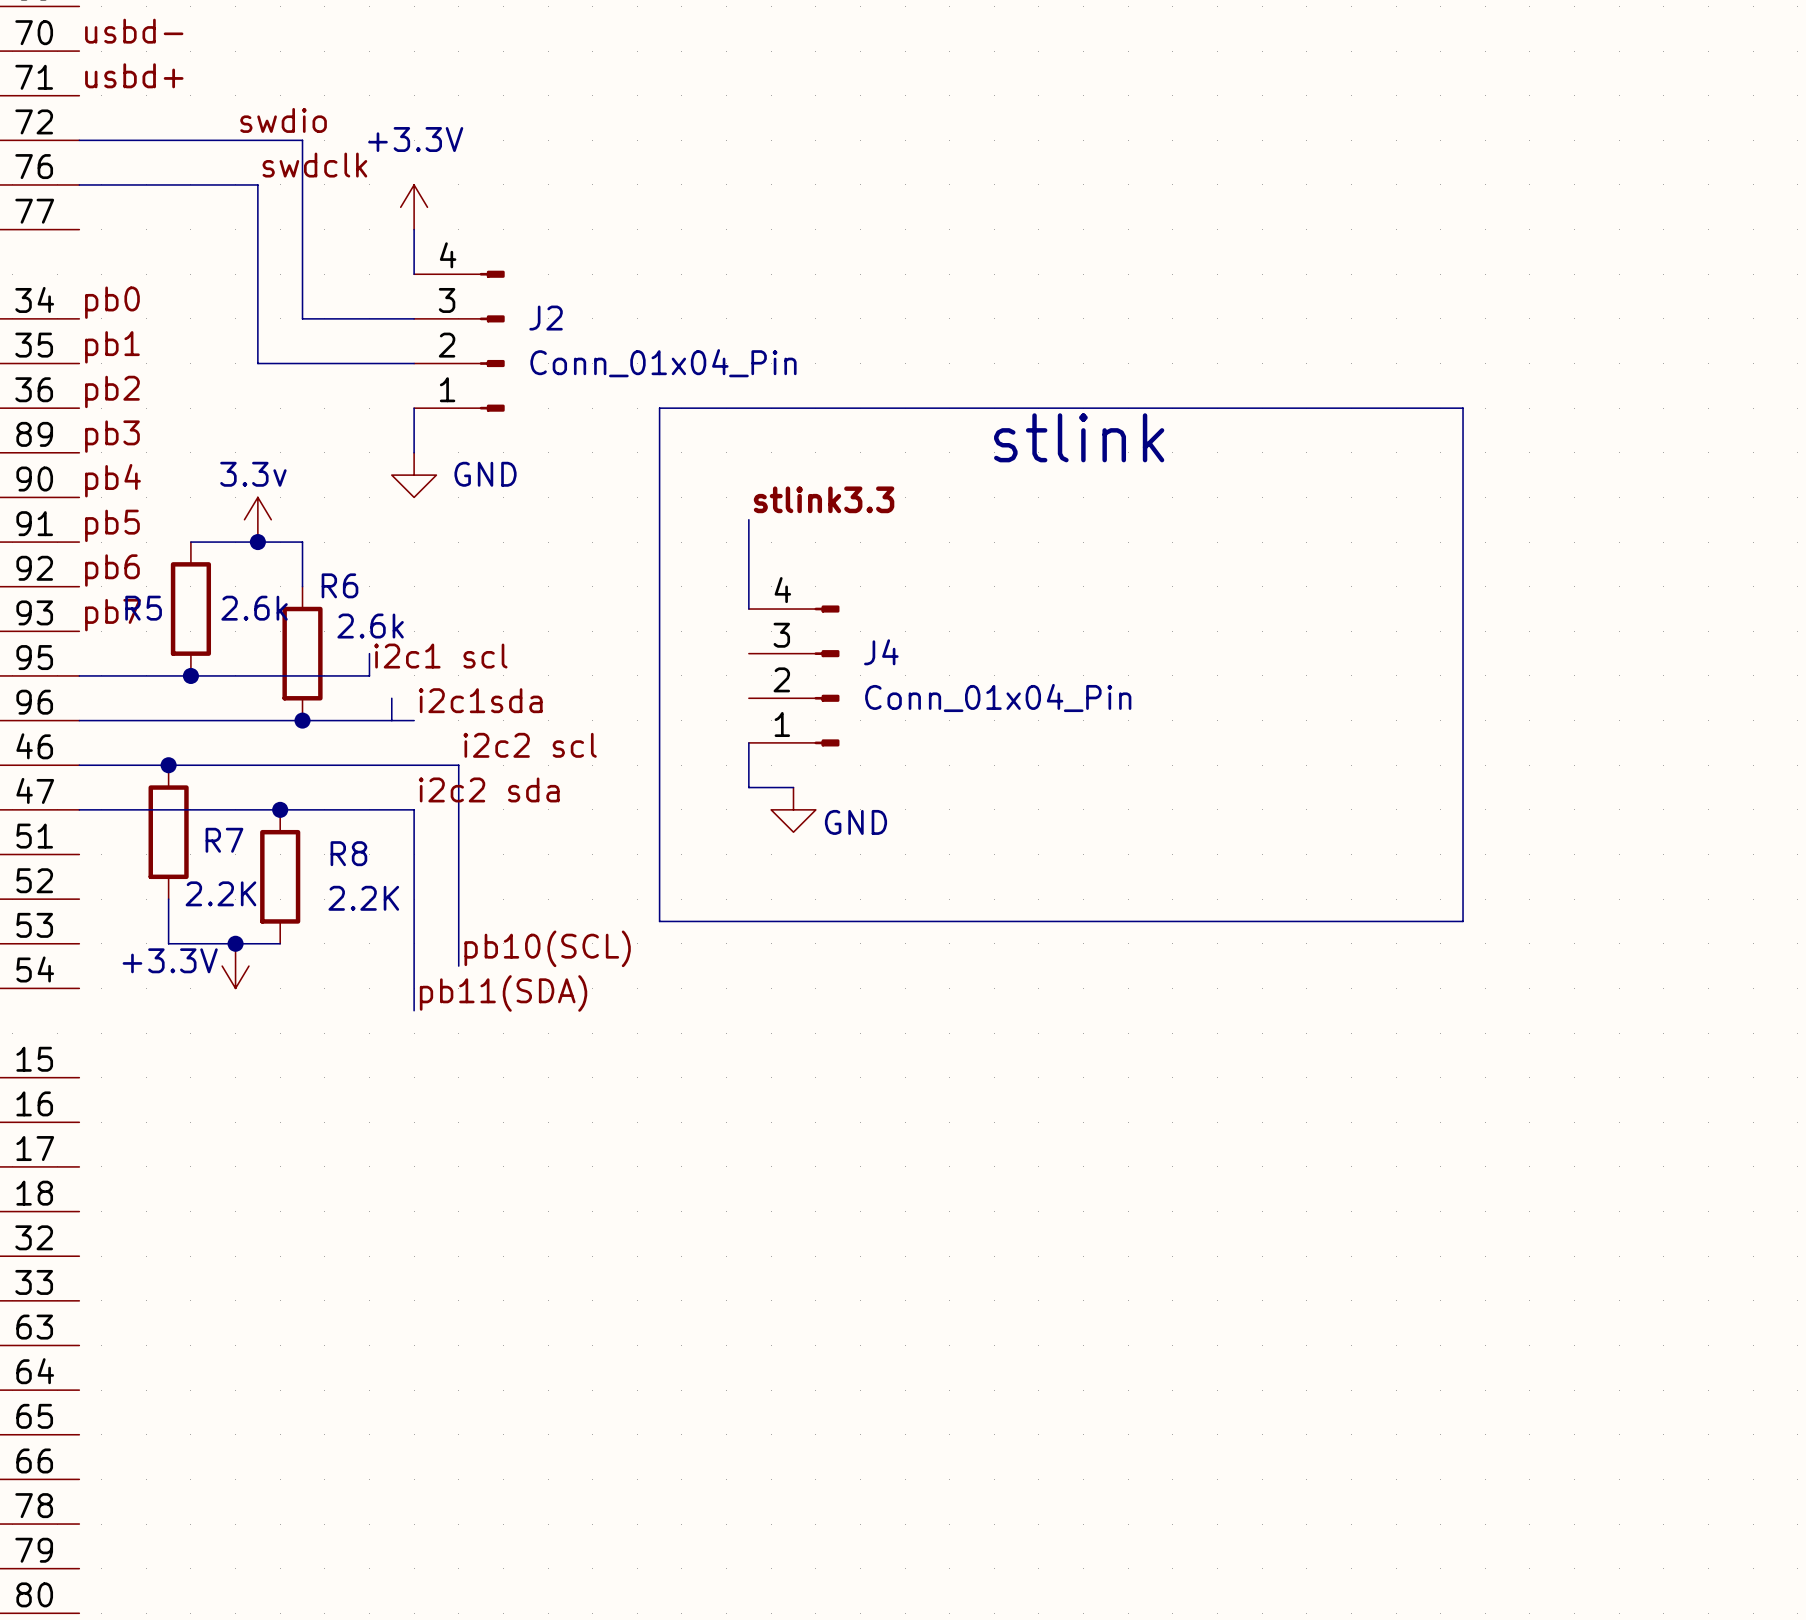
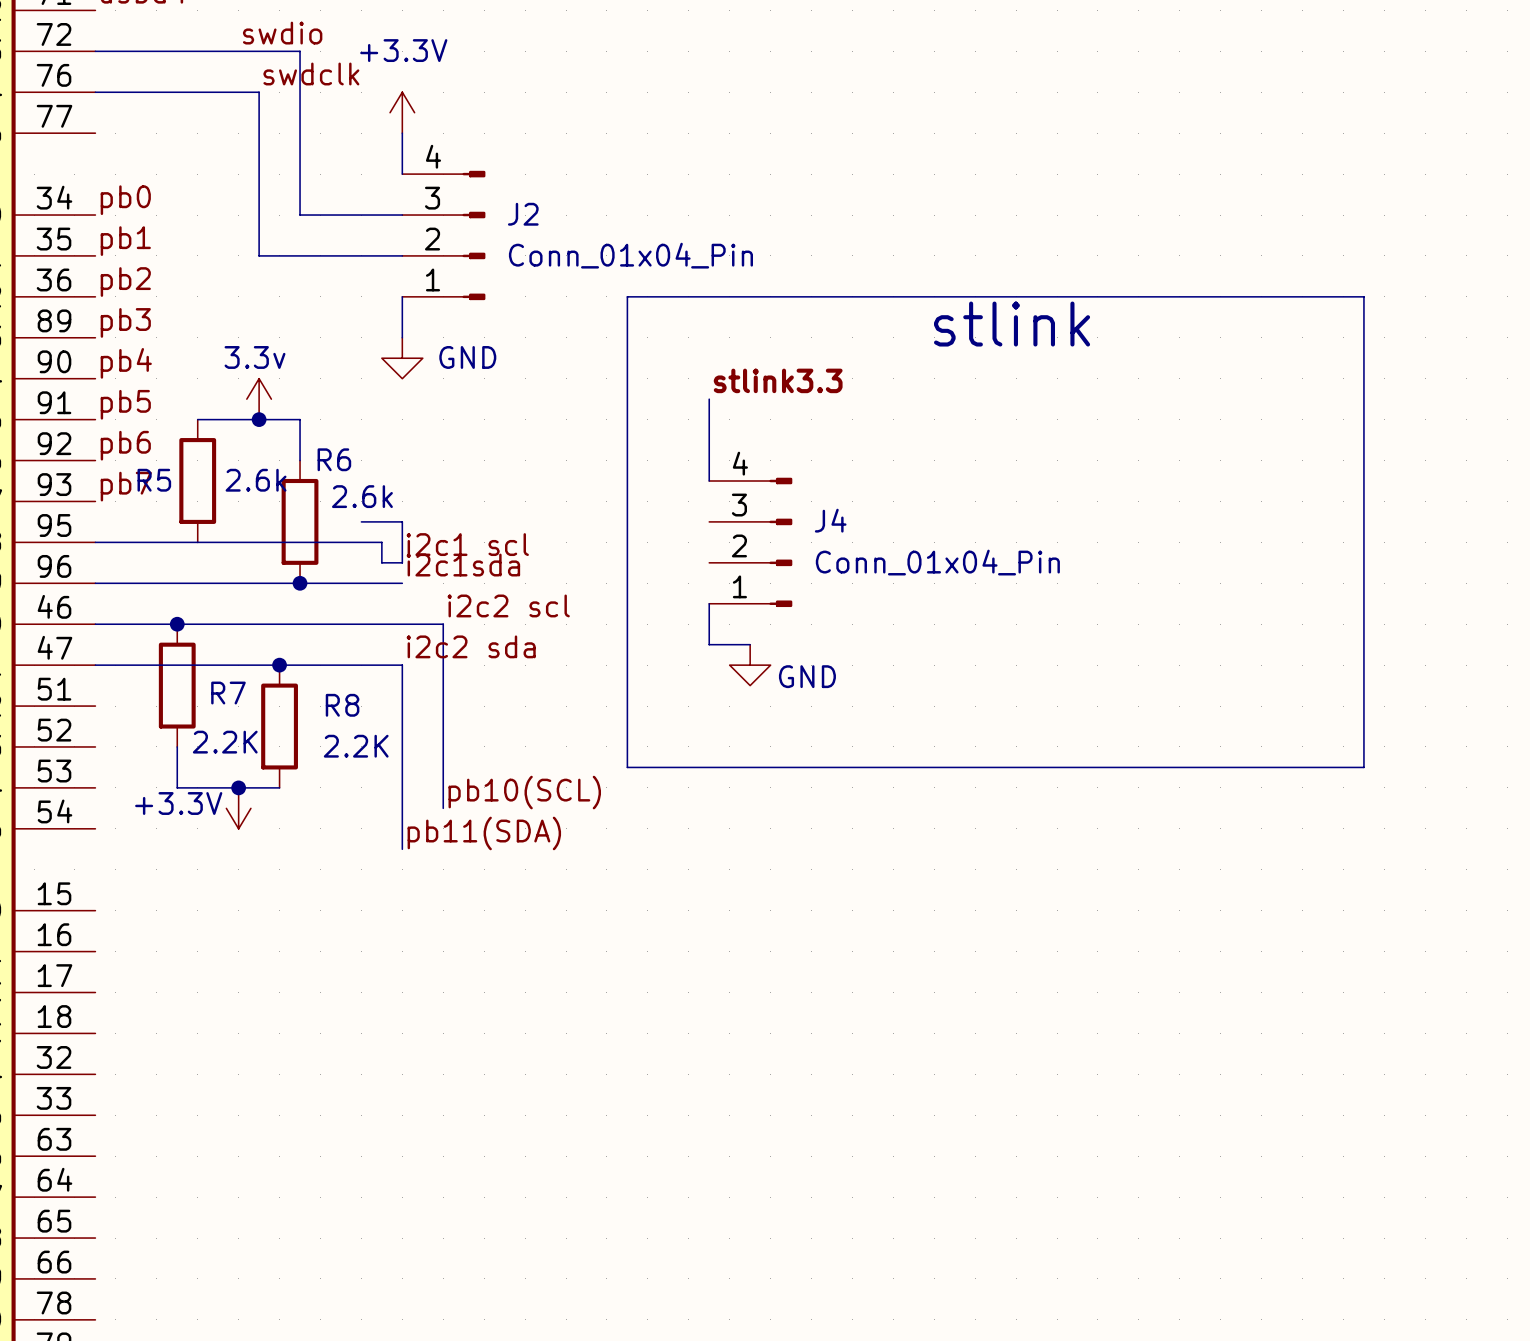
wire: (369, 653) (369, 675) -> (361, 521) (402, 521) (402, 562) (381, 562) (381, 542) (361, 542)
label position: i2c1 scl (440, 656) -> i2c1 scl (467, 544)
junction: (190, 675) -> none
wire: (391, 698) (391, 720) -> none

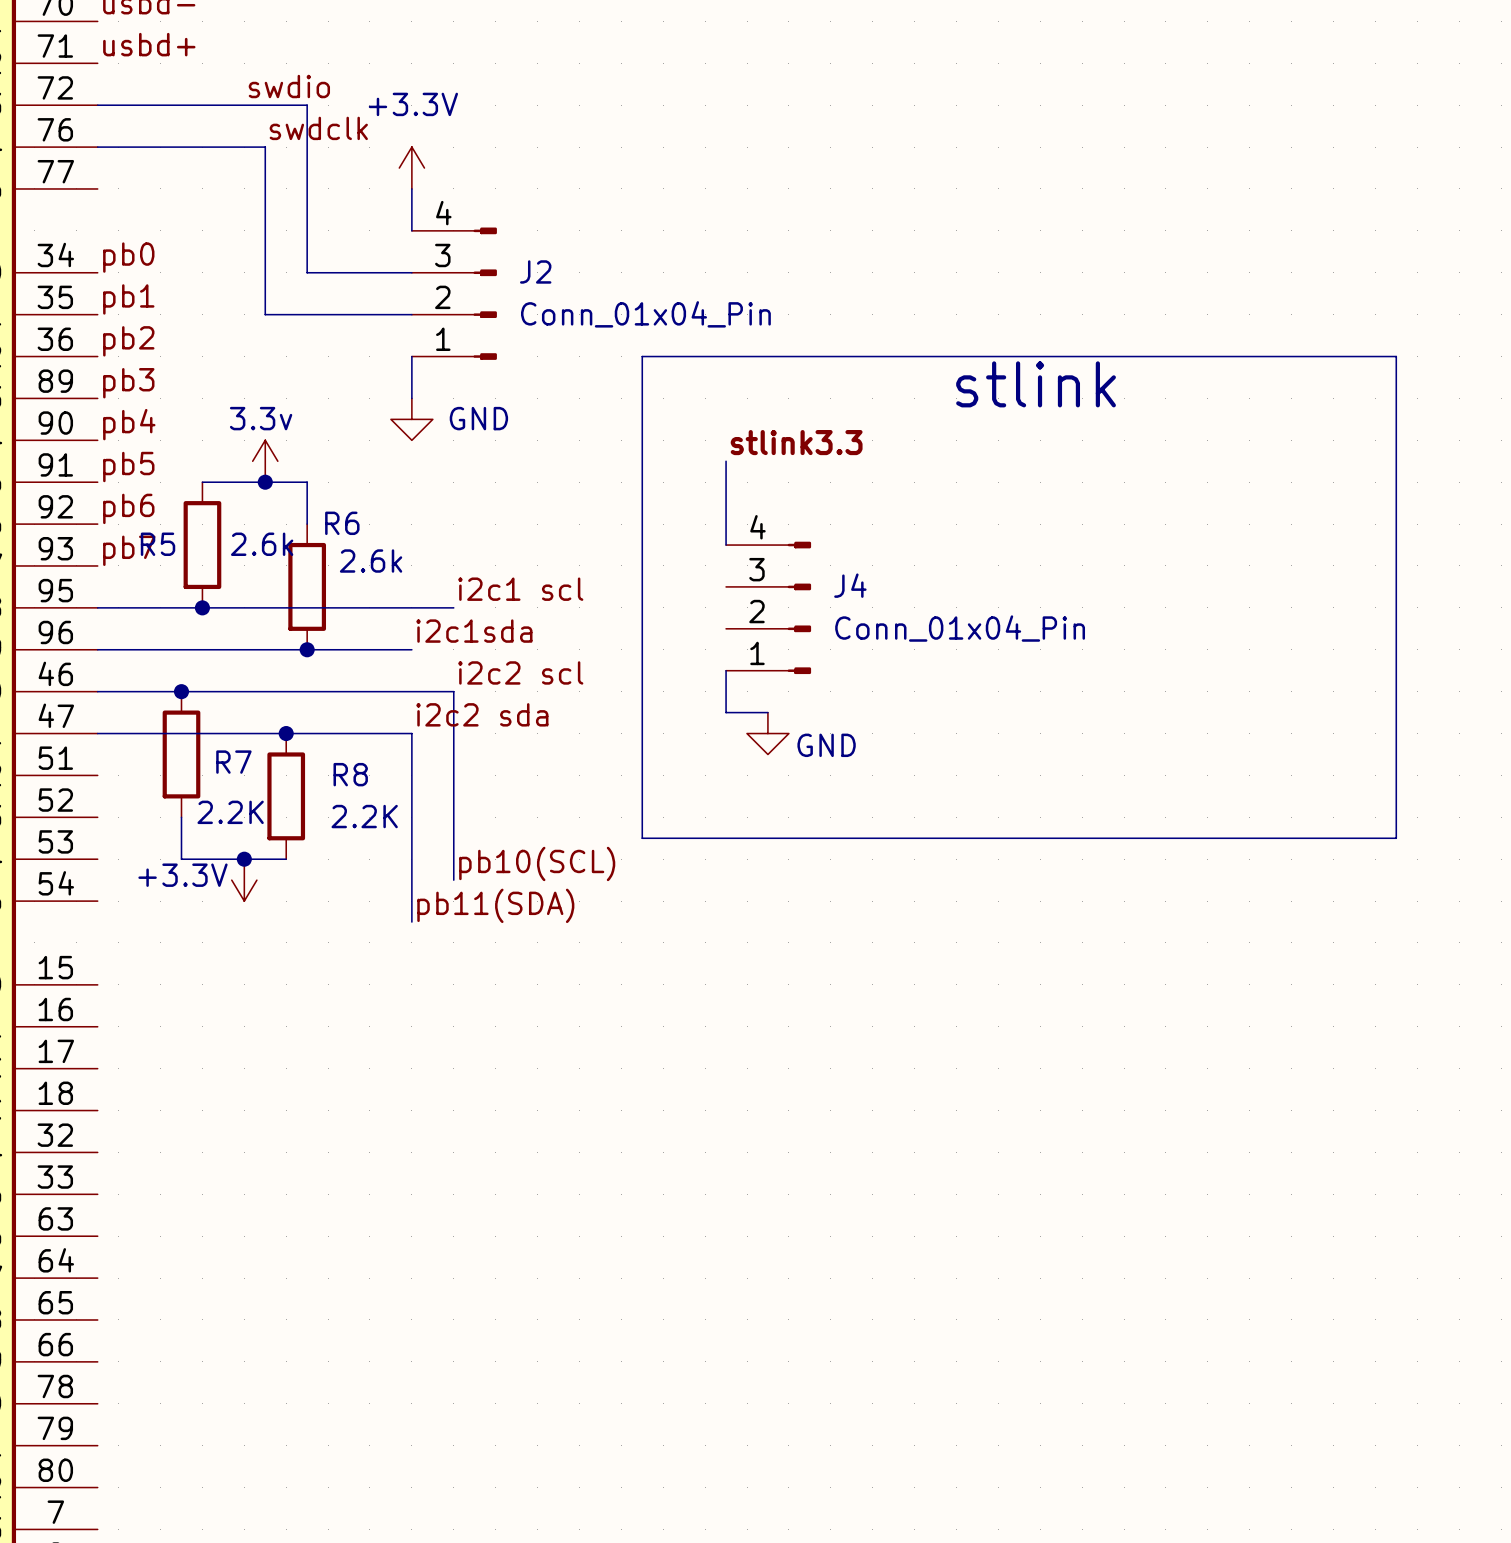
wire: (361, 521) (402, 521) (402, 562) (381, 562) (381, 542) -> (453, 607) (390, 607)
junction: none -> (202, 607)
label position: i2c1 scl (467, 544) -> i2c1 scl (520, 589)

